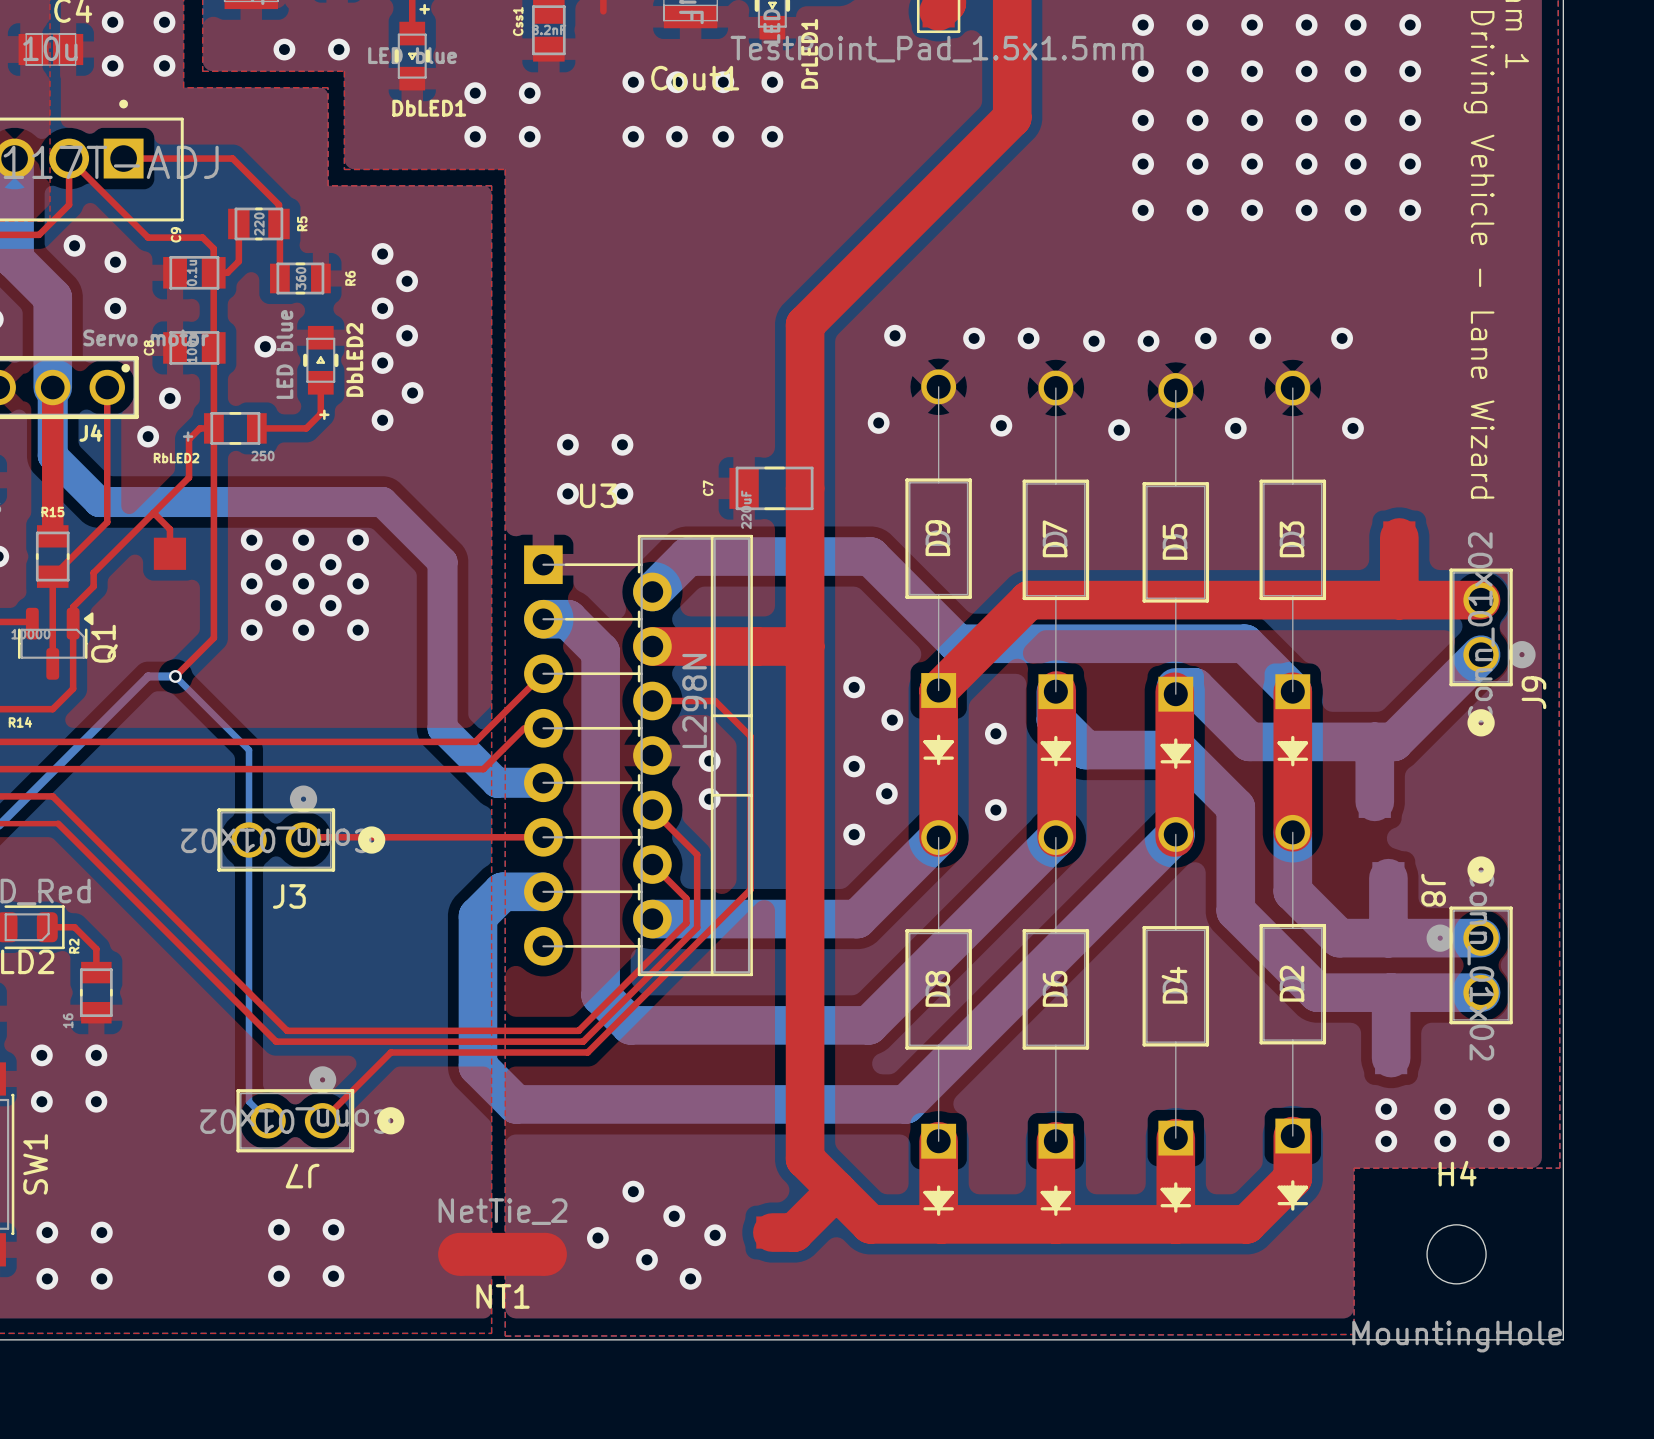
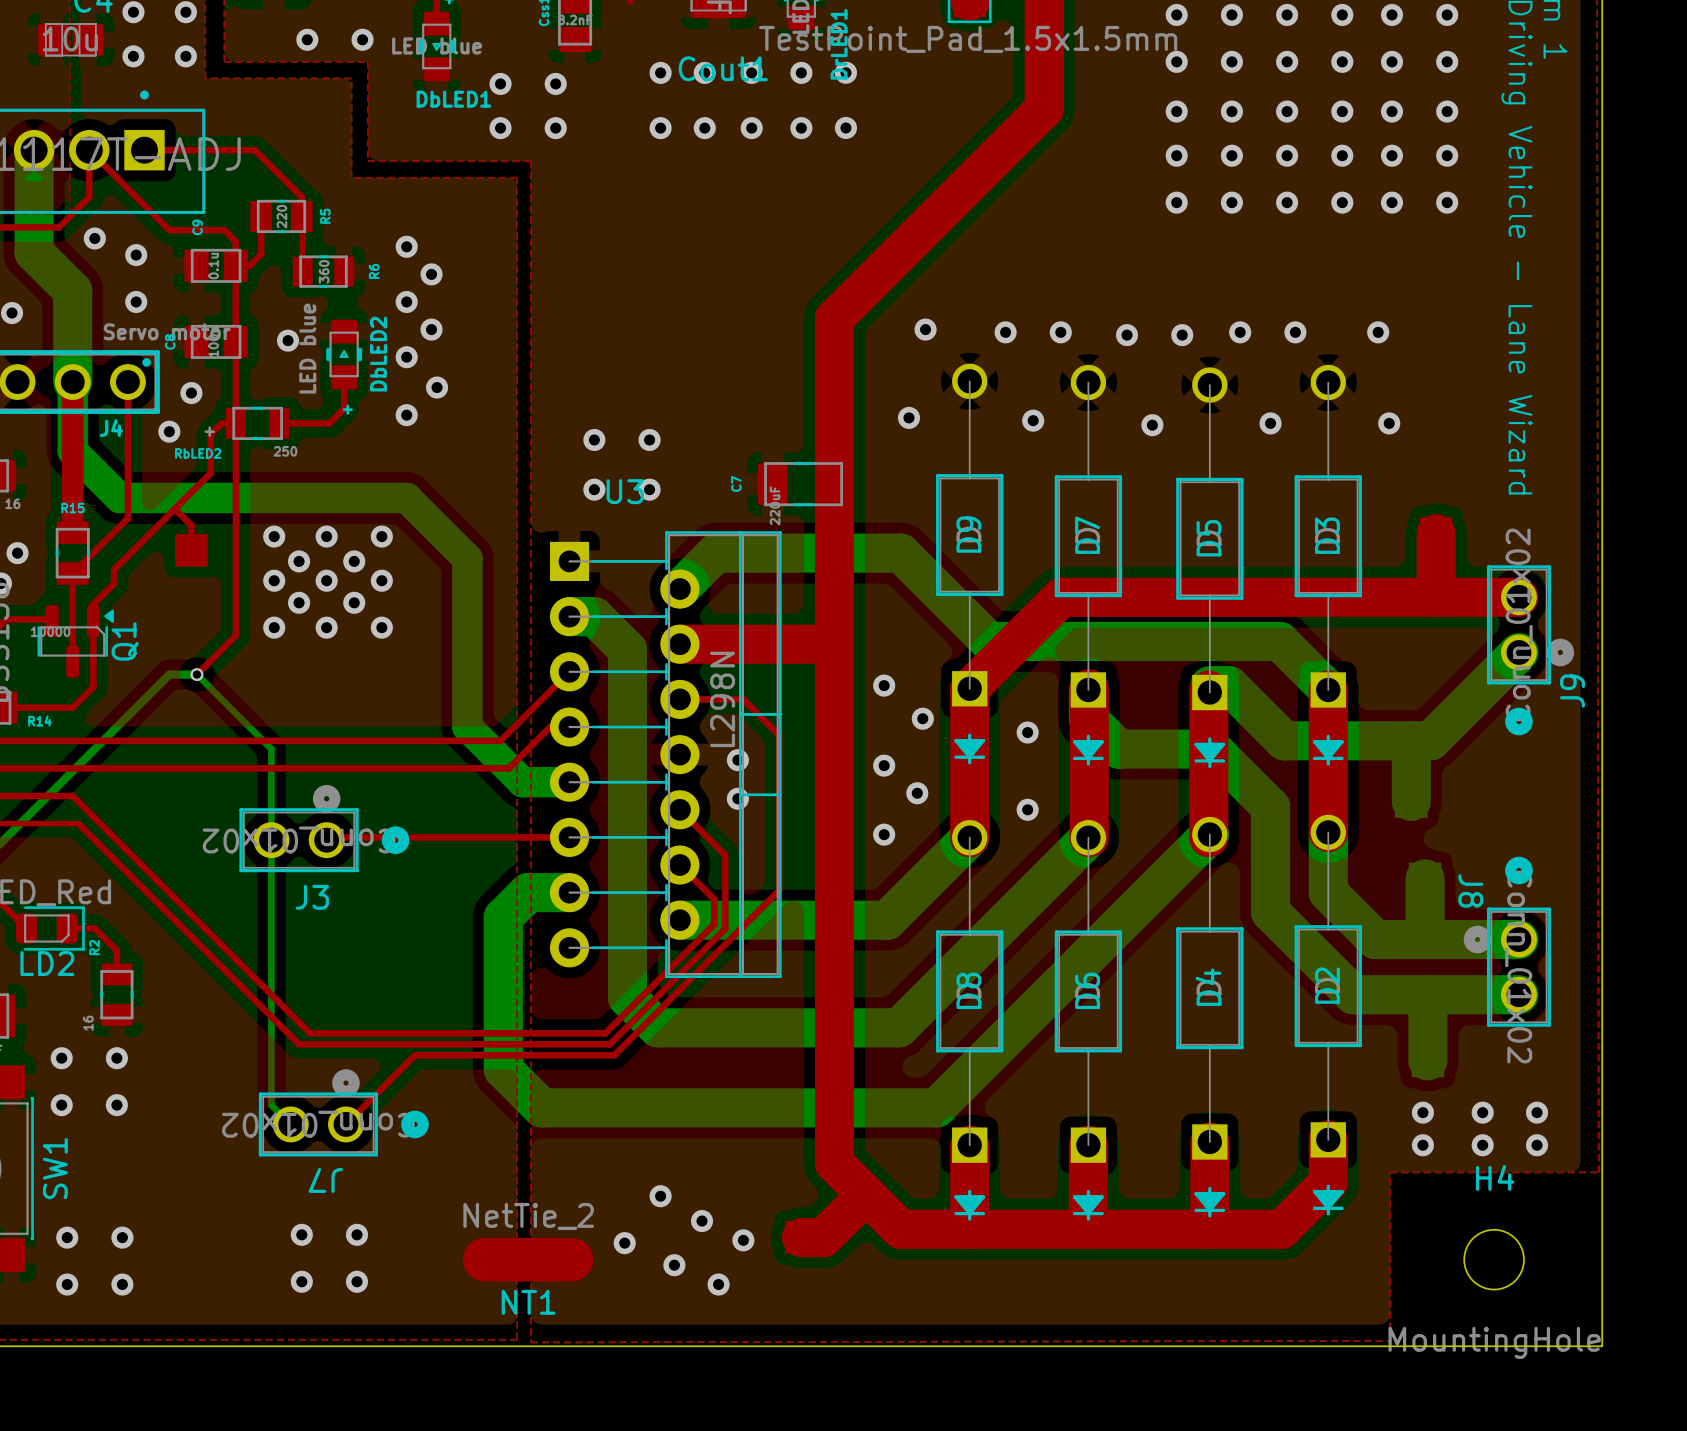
via: none -> (845, 72)
via: none -> (845, 127)

